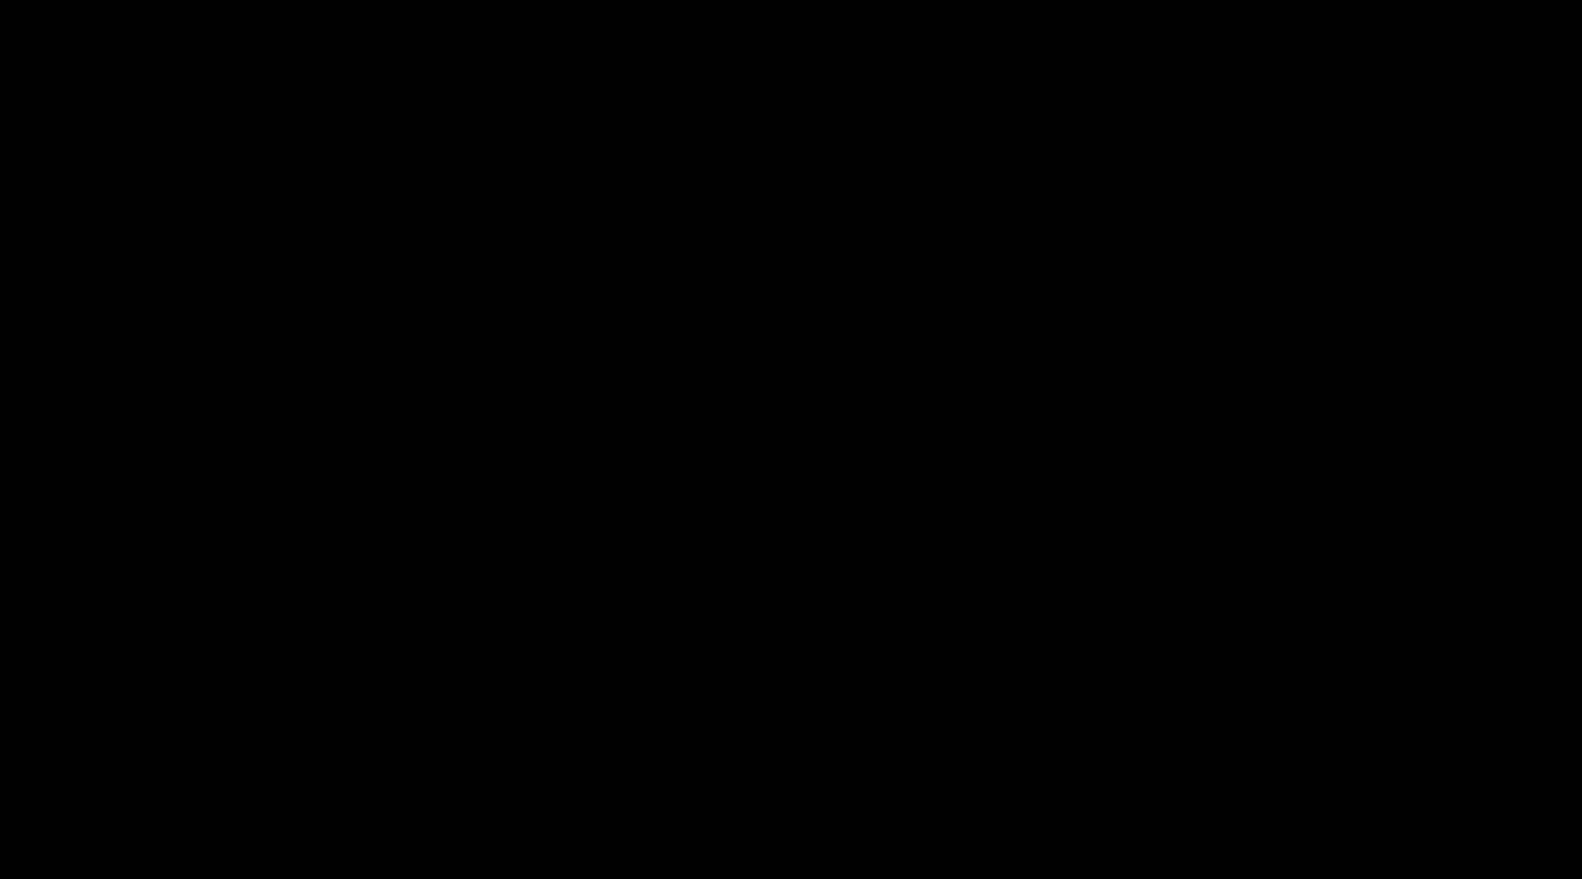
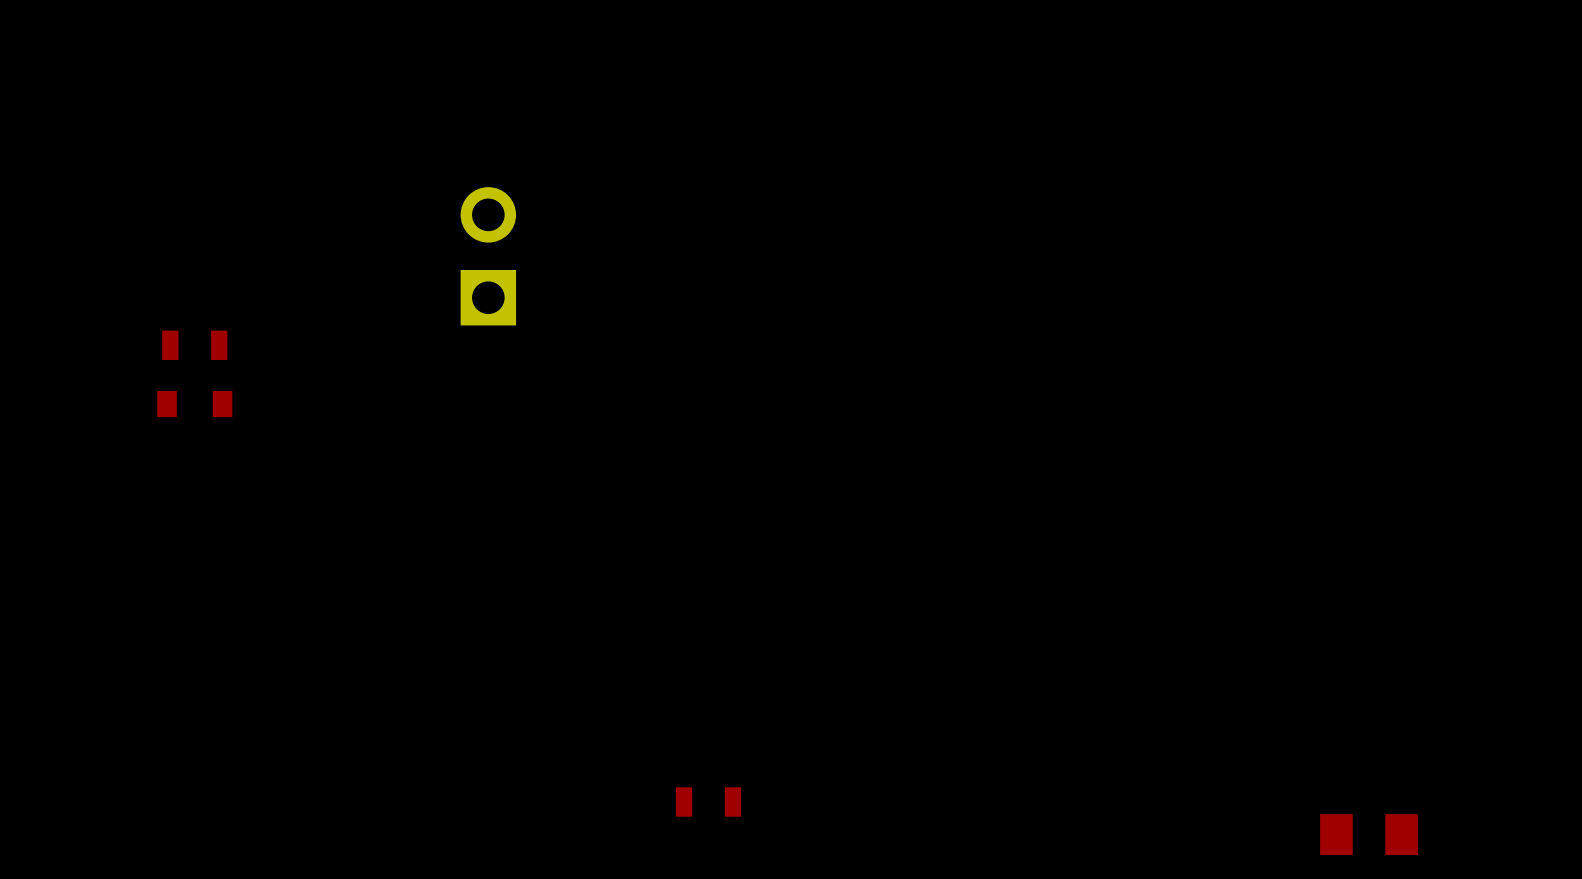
part: none -> (488, 256)
part: none -> (194, 345)
part: none -> (194, 404)
part: none -> (708, 801)
part: none -> (1369, 834)

